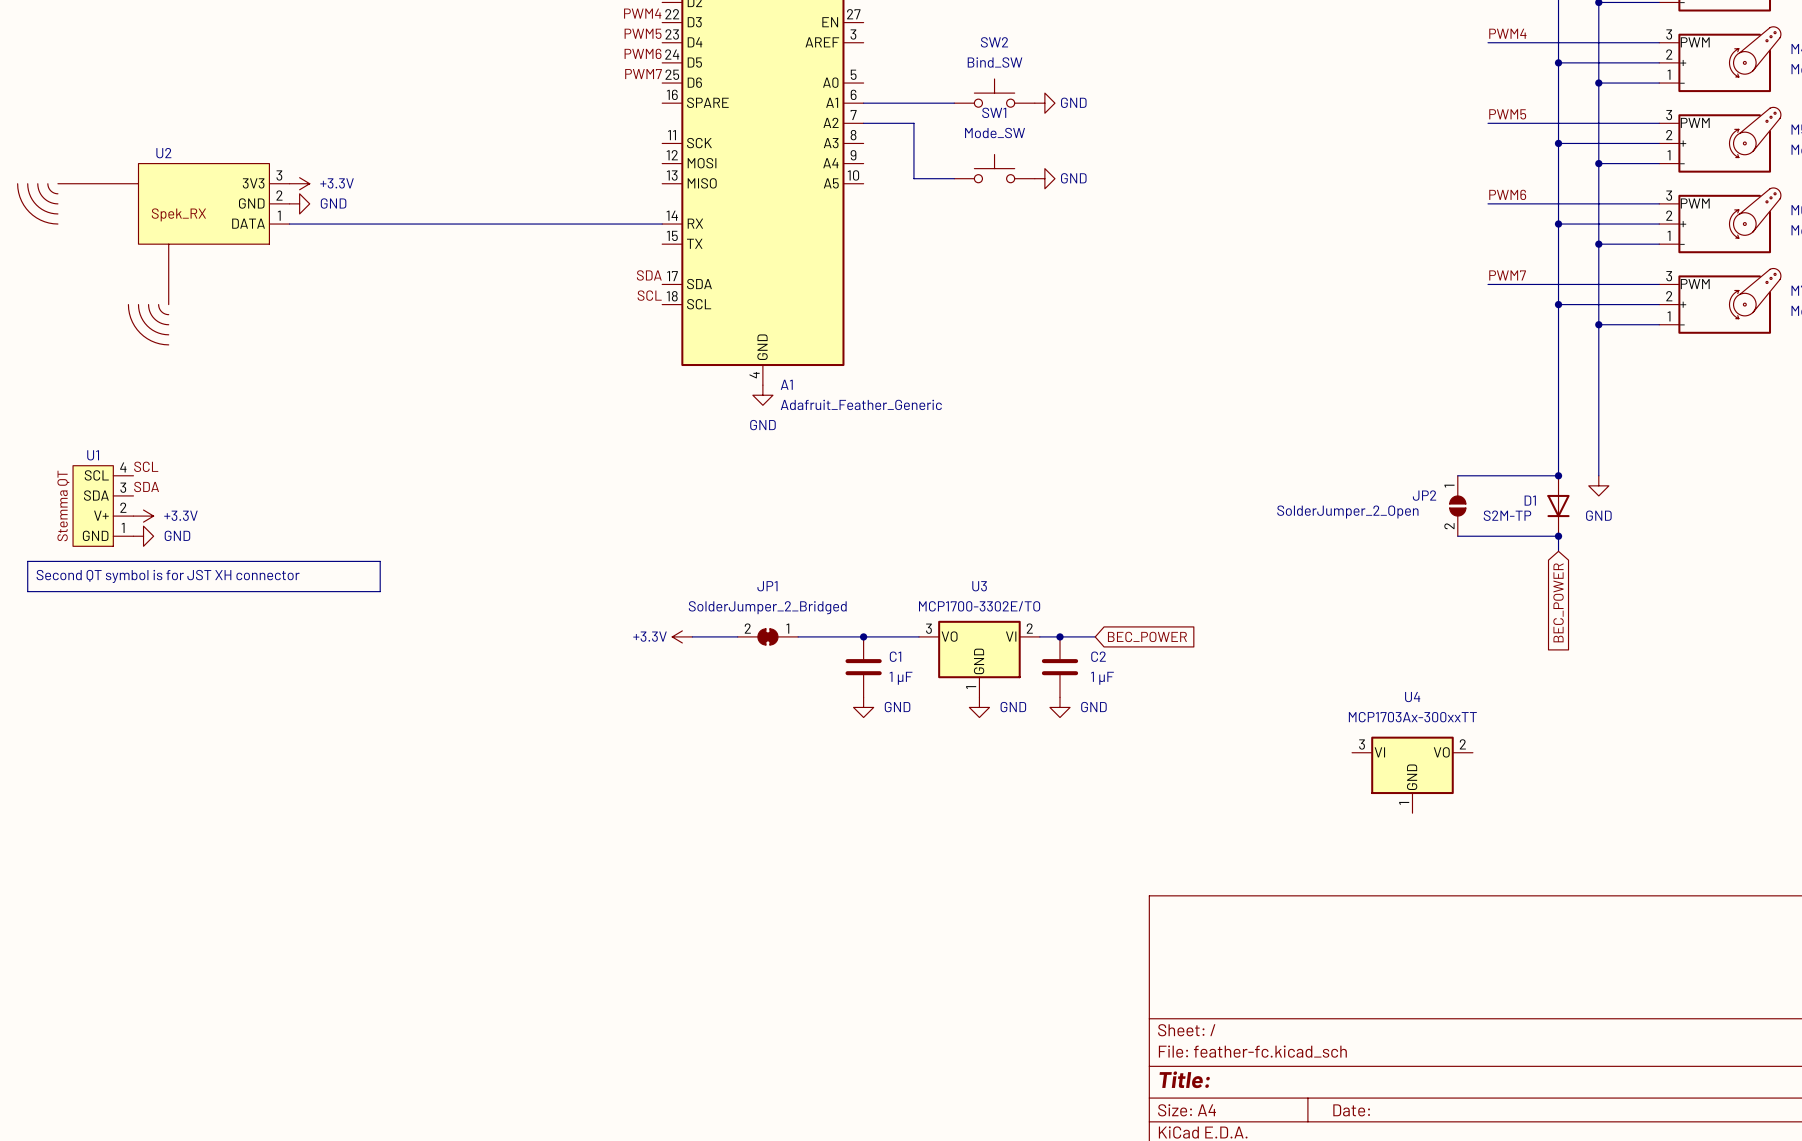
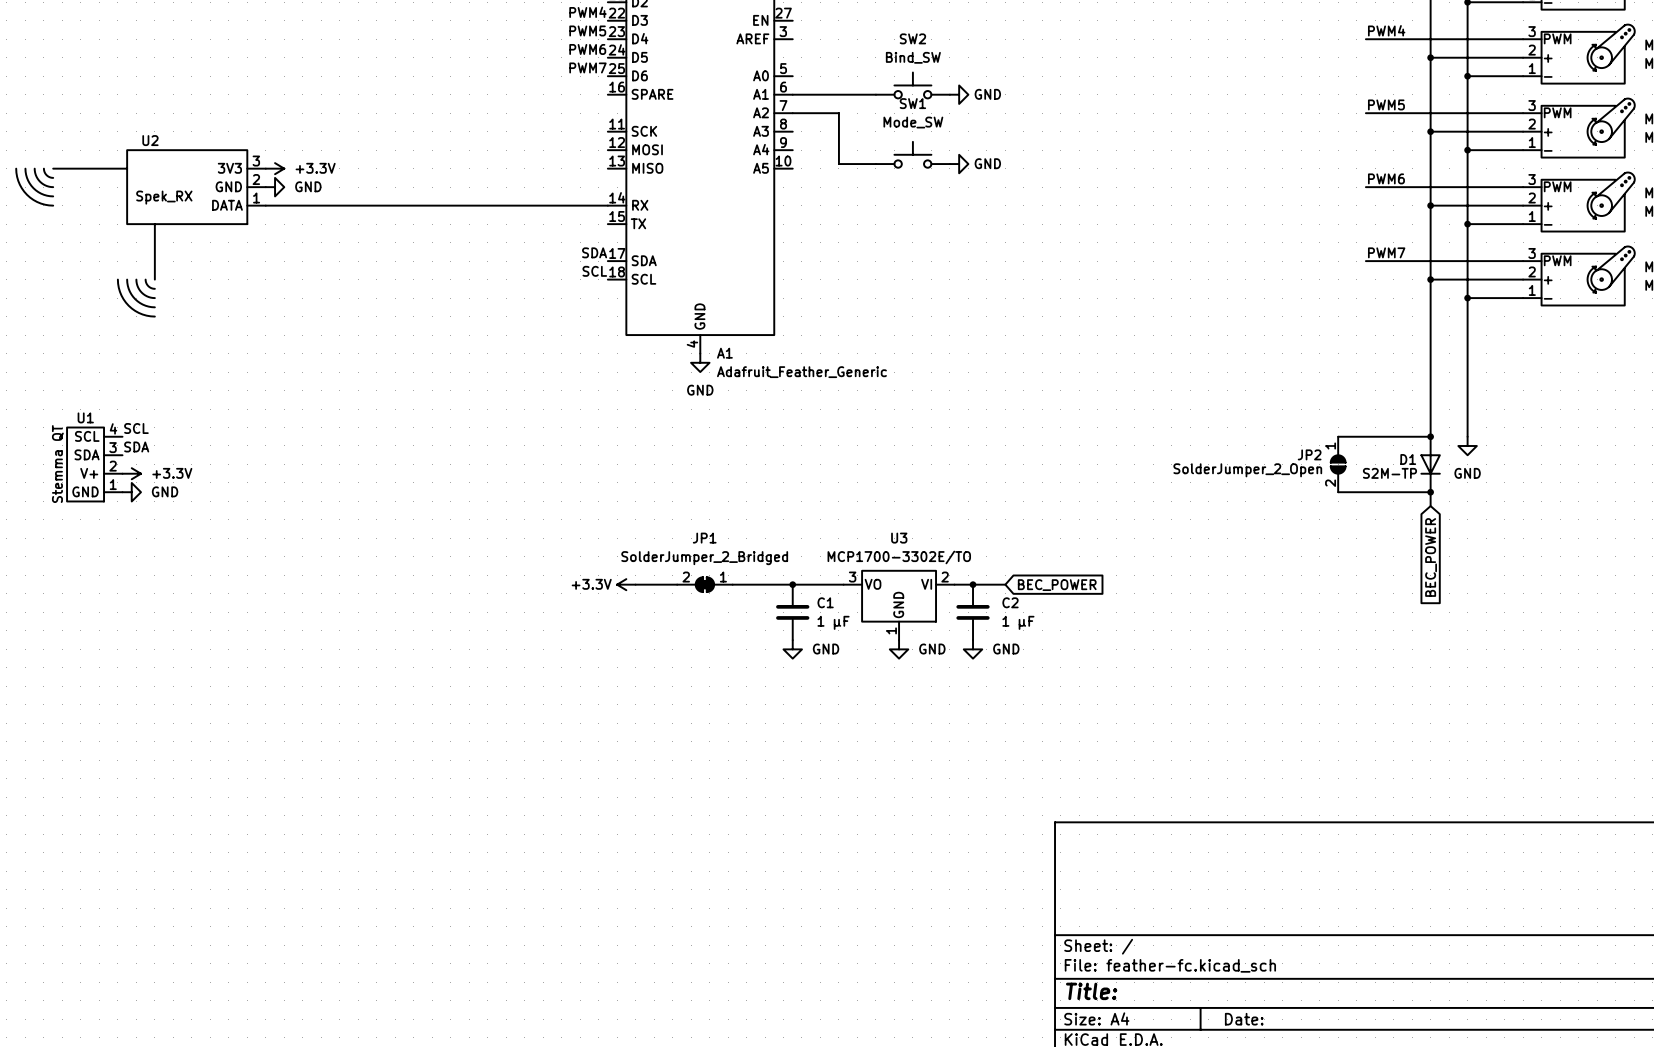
line: (27, 561) (380, 561) (380, 591) (27, 591) (27, 561) -> none
text: Second QT symbol is for JST XH connector (168, 576) -> none
U4: MCP1703Ax-300xxTT (1412, 774) -> none

